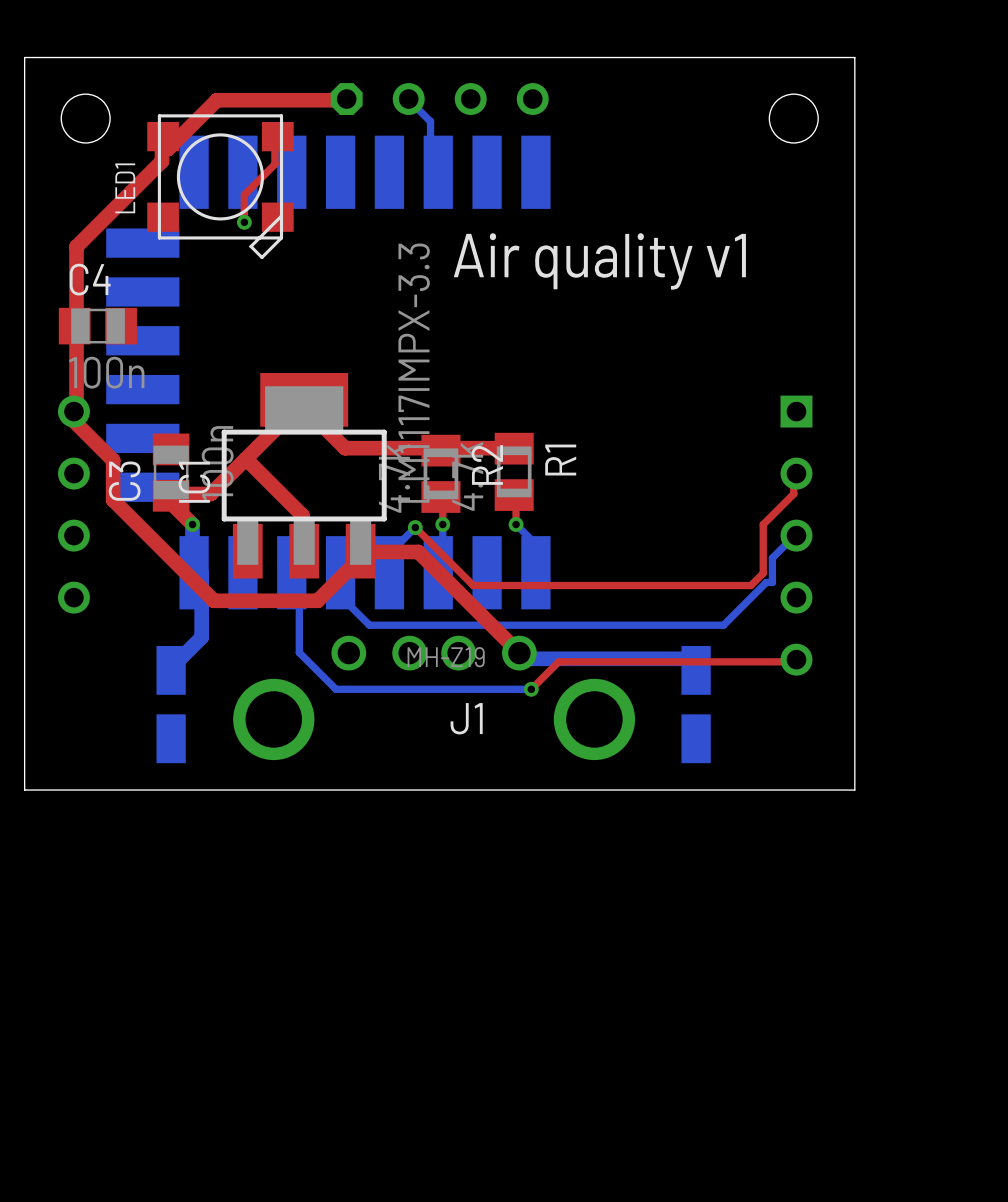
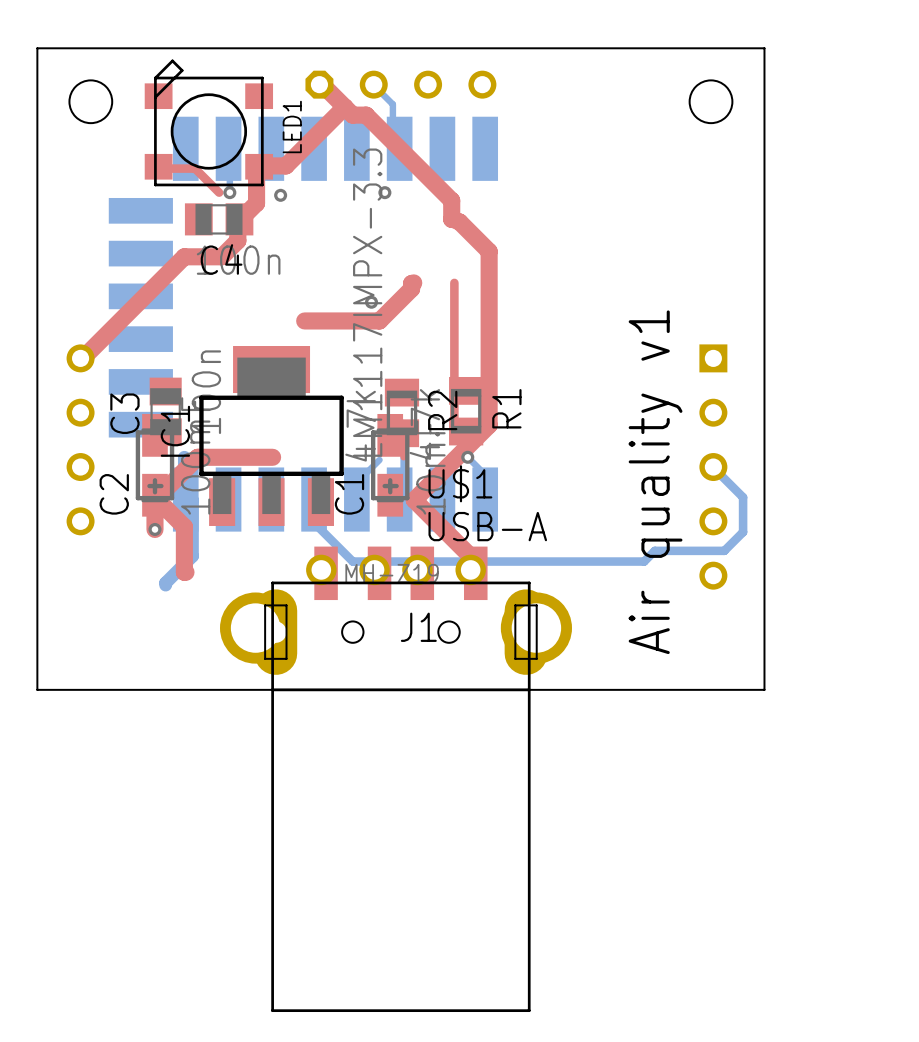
top track: (346, 99) (216, 100) (168, 149) (161, 136) (161, 161) (76, 246) (76, 326) (74, 326) (76, 332) (76, 411) -> (344, 107) (285, 165) (267, 165) (256, 168) (256, 203) (239, 219) (237, 240) (221, 256) (184, 256) (82, 358)
top track: none -> (319, 84) (320, 83) (352, 115) (366, 115) (451, 200) (451, 219) (459, 222) (489, 251) (489, 425) (414, 500) (475, 561) (475, 573)
top track: (277, 136) (274, 136) (274, 164) (244, 194) (244, 222) -> none
LED1 rotation: 0° (220, 186) -> 180° (208, 122)
top track: none -> (158, 166) (160, 168) (195, 168) (219, 192)
via: none -> (384, 192)
via: none -> (280, 195)
text rotation: 0° (599, 261) -> 90° counterclockwise (655, 482)
C4 name position: C4 (90, 279) -> C4 (221, 259)
top track: none -> (413, 282) (411, 283) (411, 288) (379, 320) (304, 320)
top track: none -> (454, 282) (454, 433)
C4 position: (97, 326) -> (219, 219)
via: none -> (371, 302)
top track: (73, 411) (70, 417) (113, 460) (113, 500) (213, 600) (317, 600) (360, 558) (360, 551) (418, 551) (519, 653) -> none
top track: (514, 448) (442, 448) (440, 450) (436, 448) (345, 448) (305, 408) (304, 399) (210, 493) (171, 493) (168, 500) (192, 524) -> none
top track: (245, 458) (302, 515) (302, 548) (304, 551) -> none
top track: (796, 473) (793, 475) (793, 493) (763, 524) (763, 573) (751, 585) (473, 585) (415, 527) -> none
IC1 position: (304, 475) -> (271, 435)
via position: (192, 524) -> (154, 529)
top track: none -> (272, 457) (197, 457) (163, 492) (154, 495) (154, 529)
via: (442, 524) -> none
via: (415, 527) -> none
bottom track: (796, 535) (772, 558) (772, 582) (766, 582) (723, 625) (369, 625) (342, 597) -> (713, 467) (743, 497) (743, 532) (724, 550) (654, 550) (644, 561) (352, 561) (315, 524) (315, 521)
top track: none -> (154, 497) (184, 526) (184, 572) (185, 572)
bottom track: (291, 572) (299, 573) (299, 652) (335, 689) (531, 689) -> none
bottom track: (519, 653) (531, 658) (686, 658) (696, 667) (696, 670) -> none
top track: (796, 659) (793, 661) (558, 661) (531, 689) -> none
via: (531, 689) -> none
C2 side: bottom (171, 704) -> top (154, 465)
C1 side: bottom (696, 704) -> top (390, 465)
U$1: none -> USB-A (400, 779)

